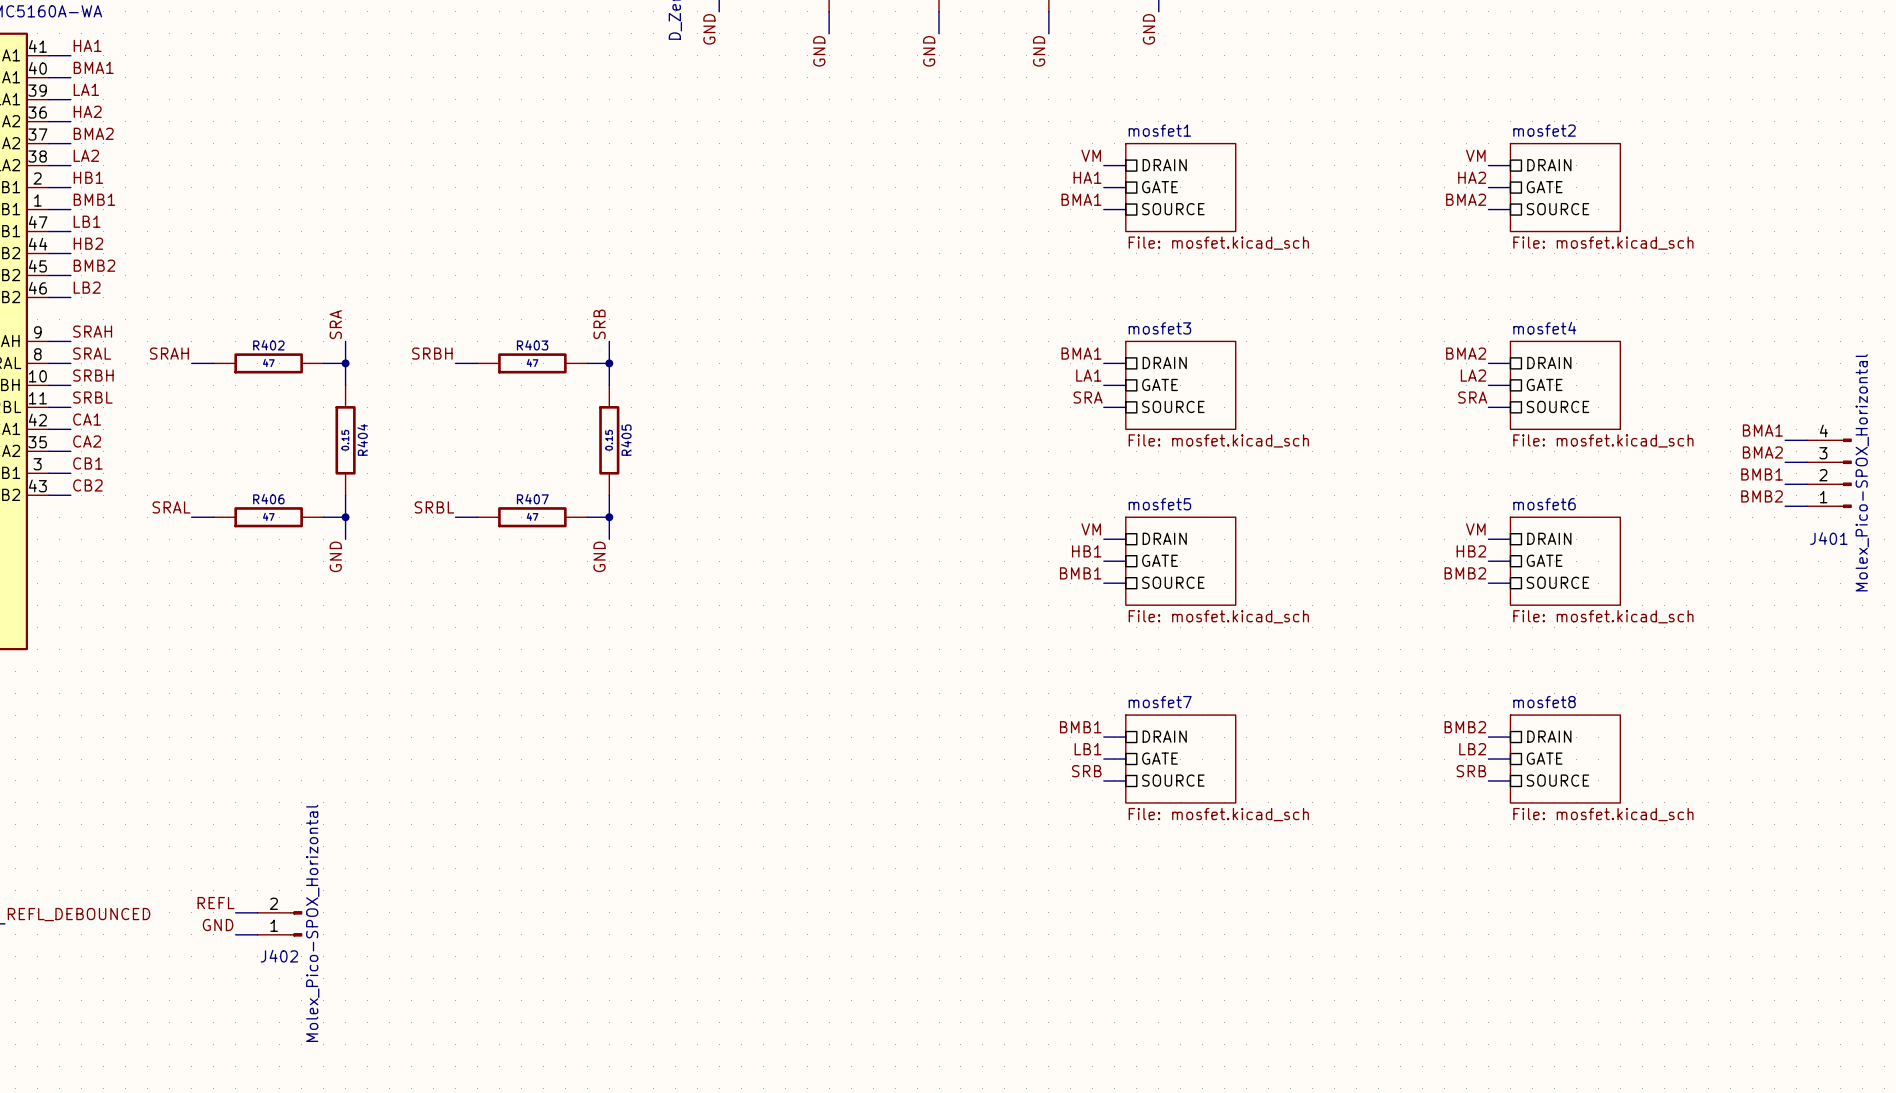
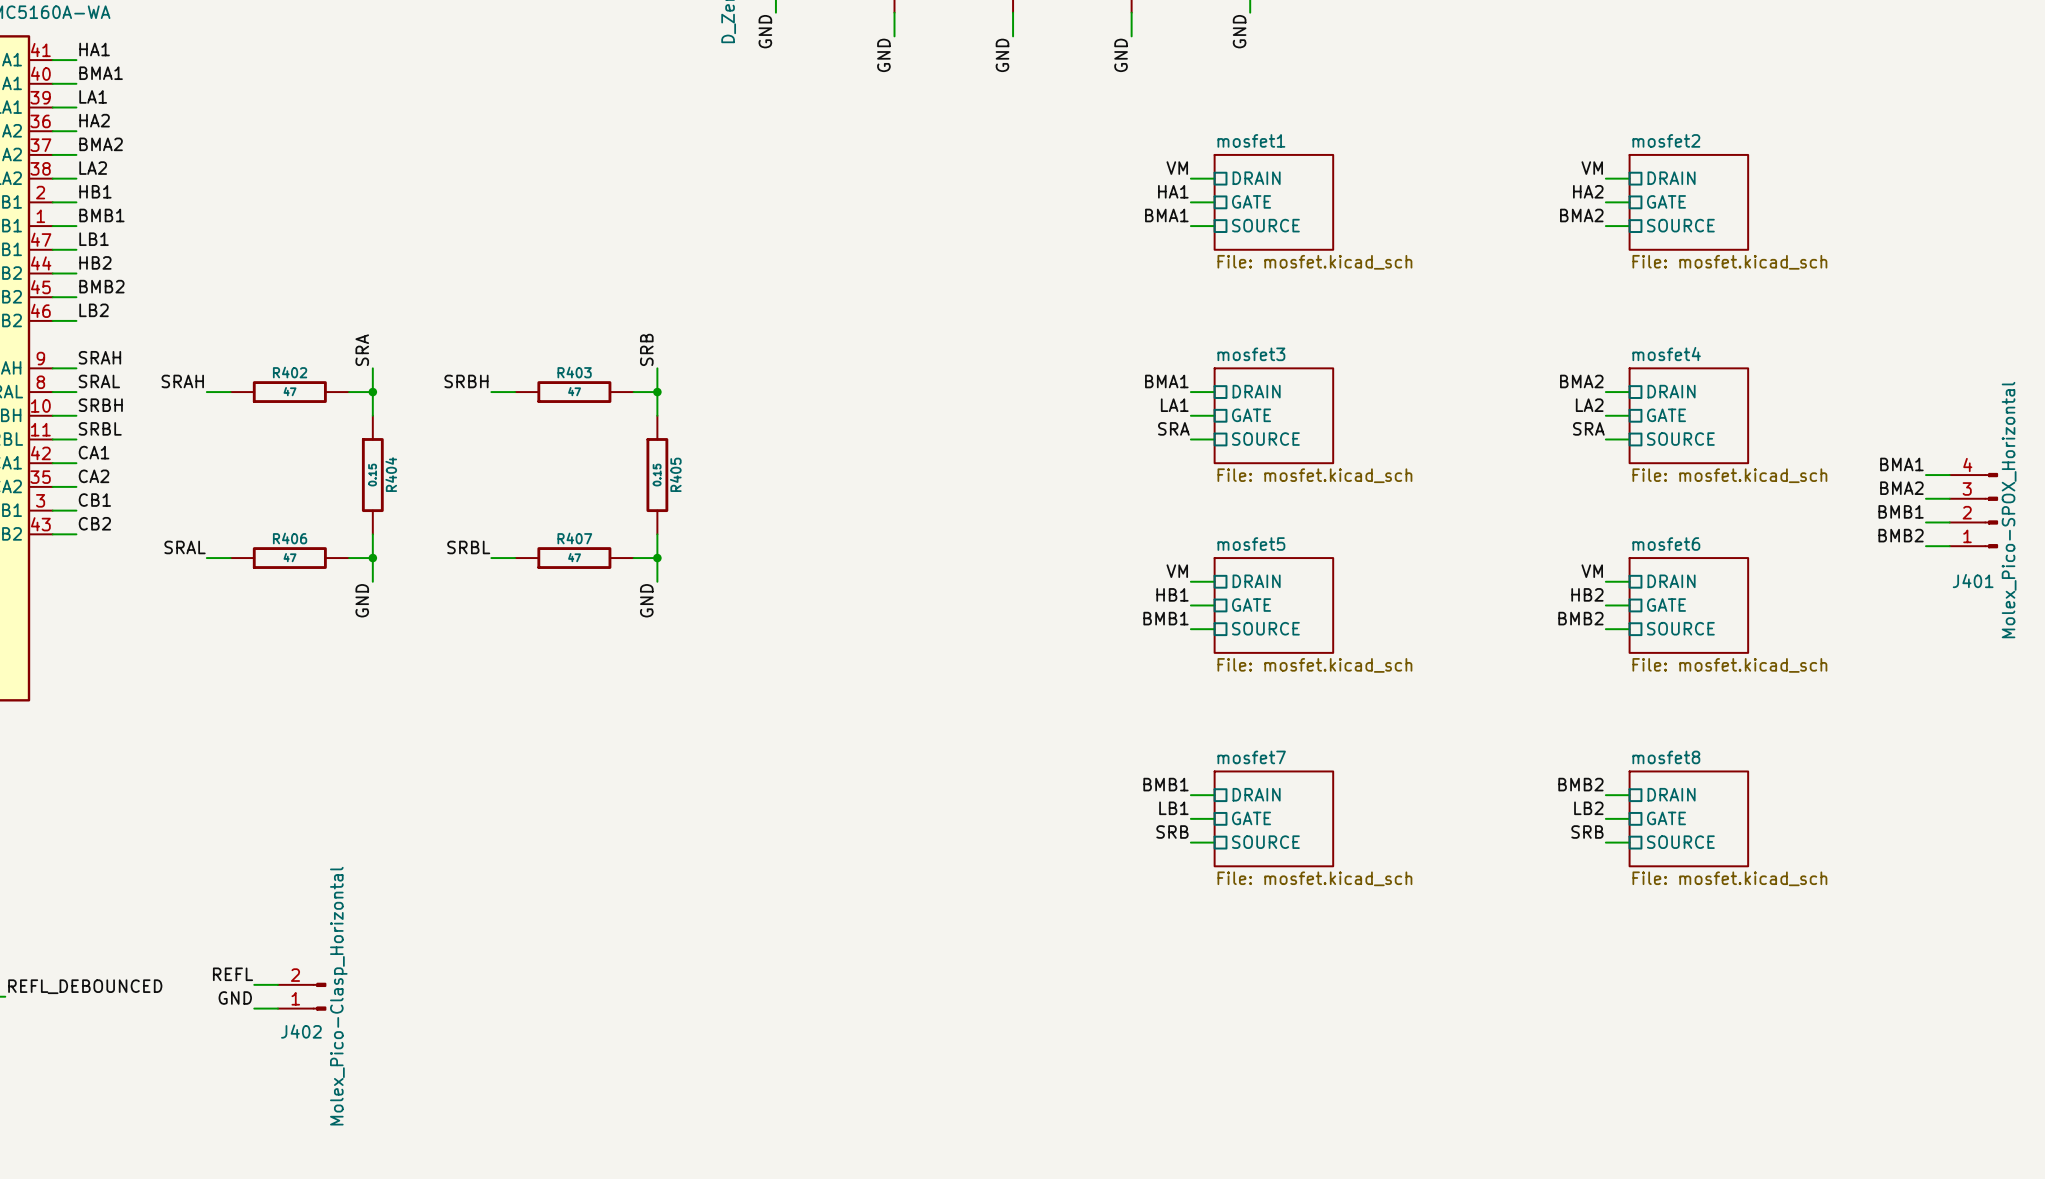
J402 value: Molex_Pico-SPOX_Horizontal (312, 923) -> Molex_Pico-Clasp_Horizontal (338, 996)

